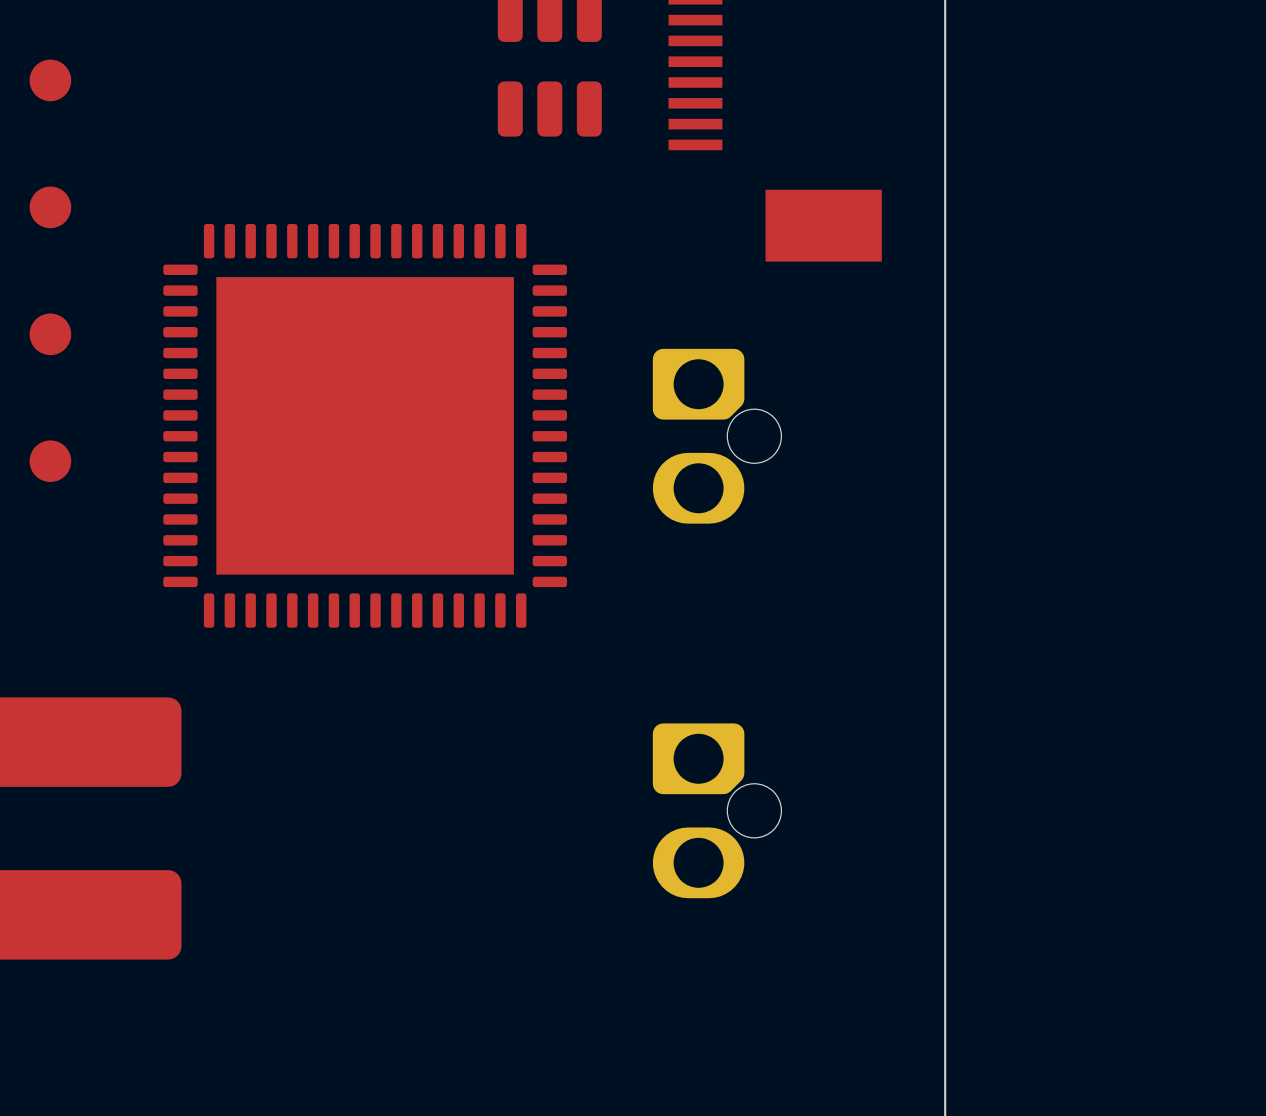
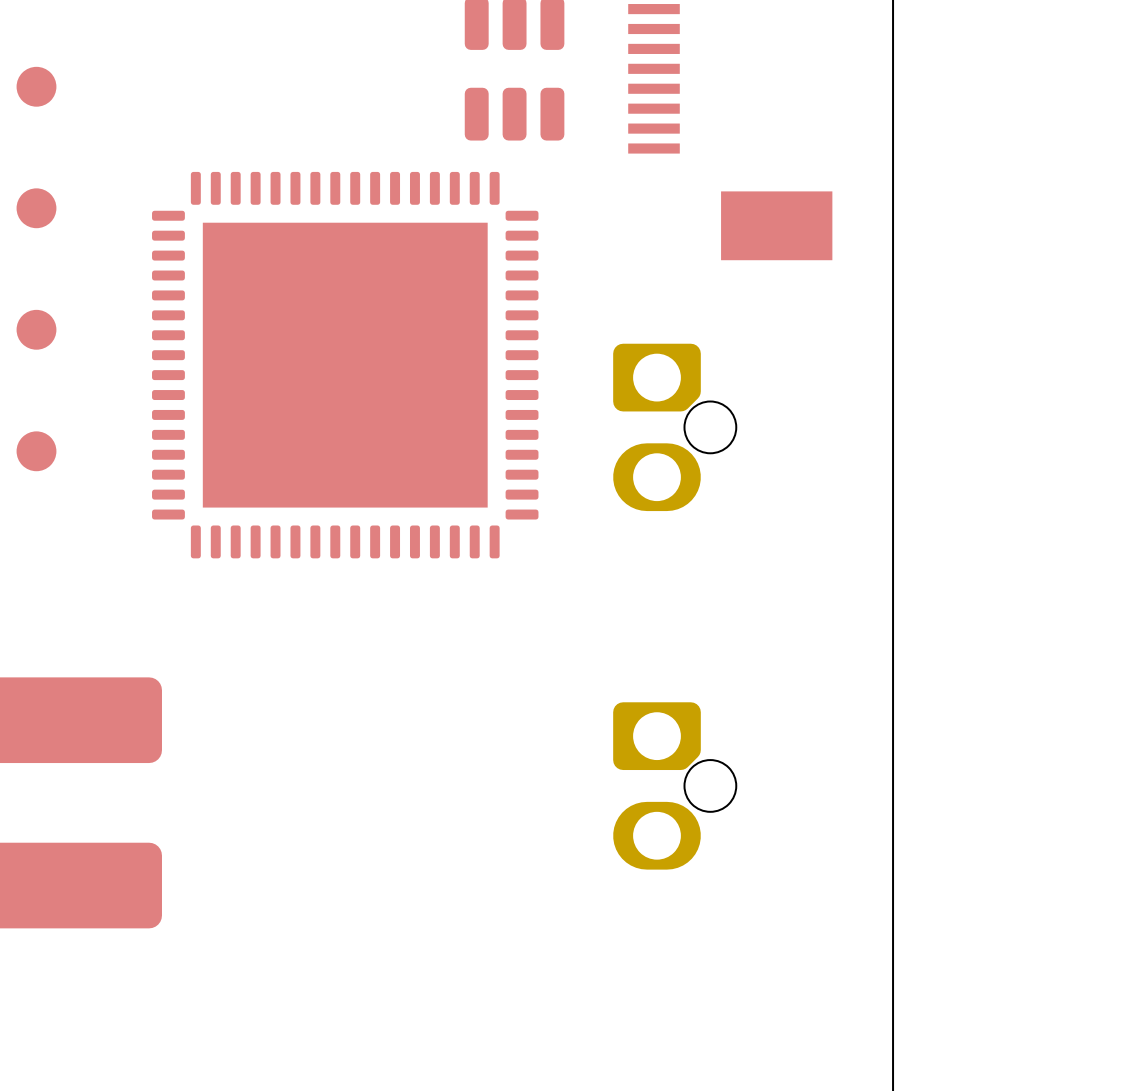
part position: (365, 425) -> (345, 365)

